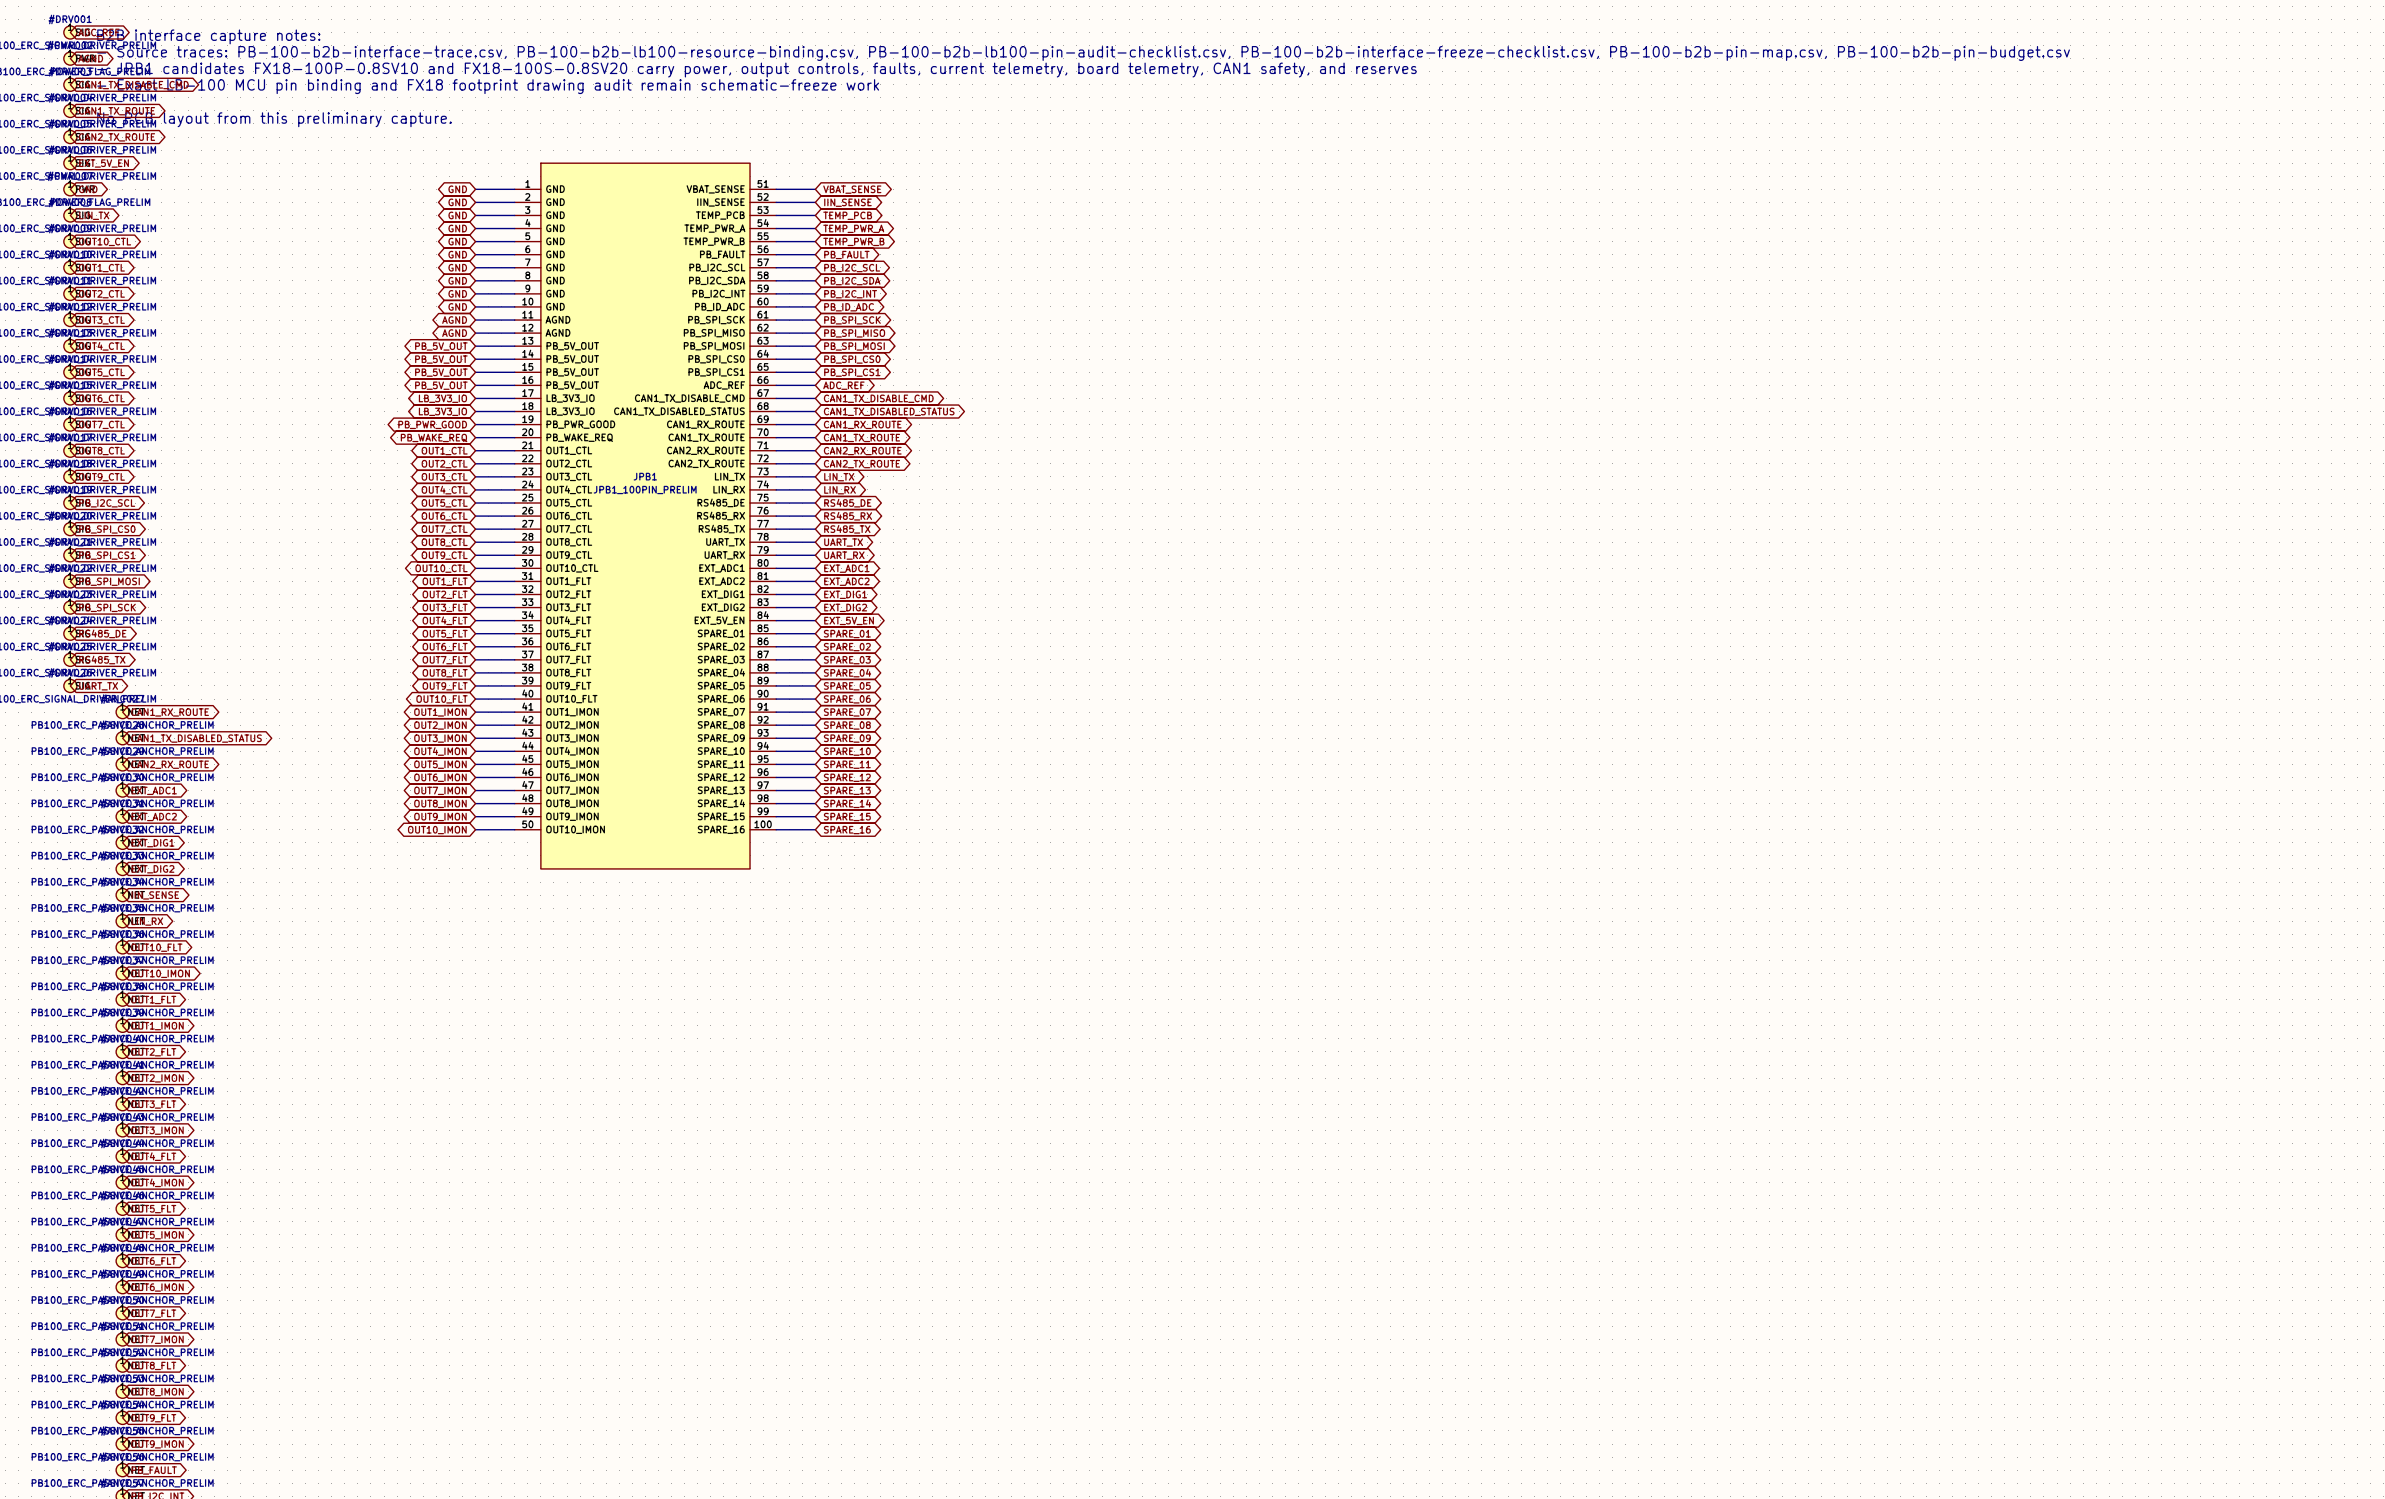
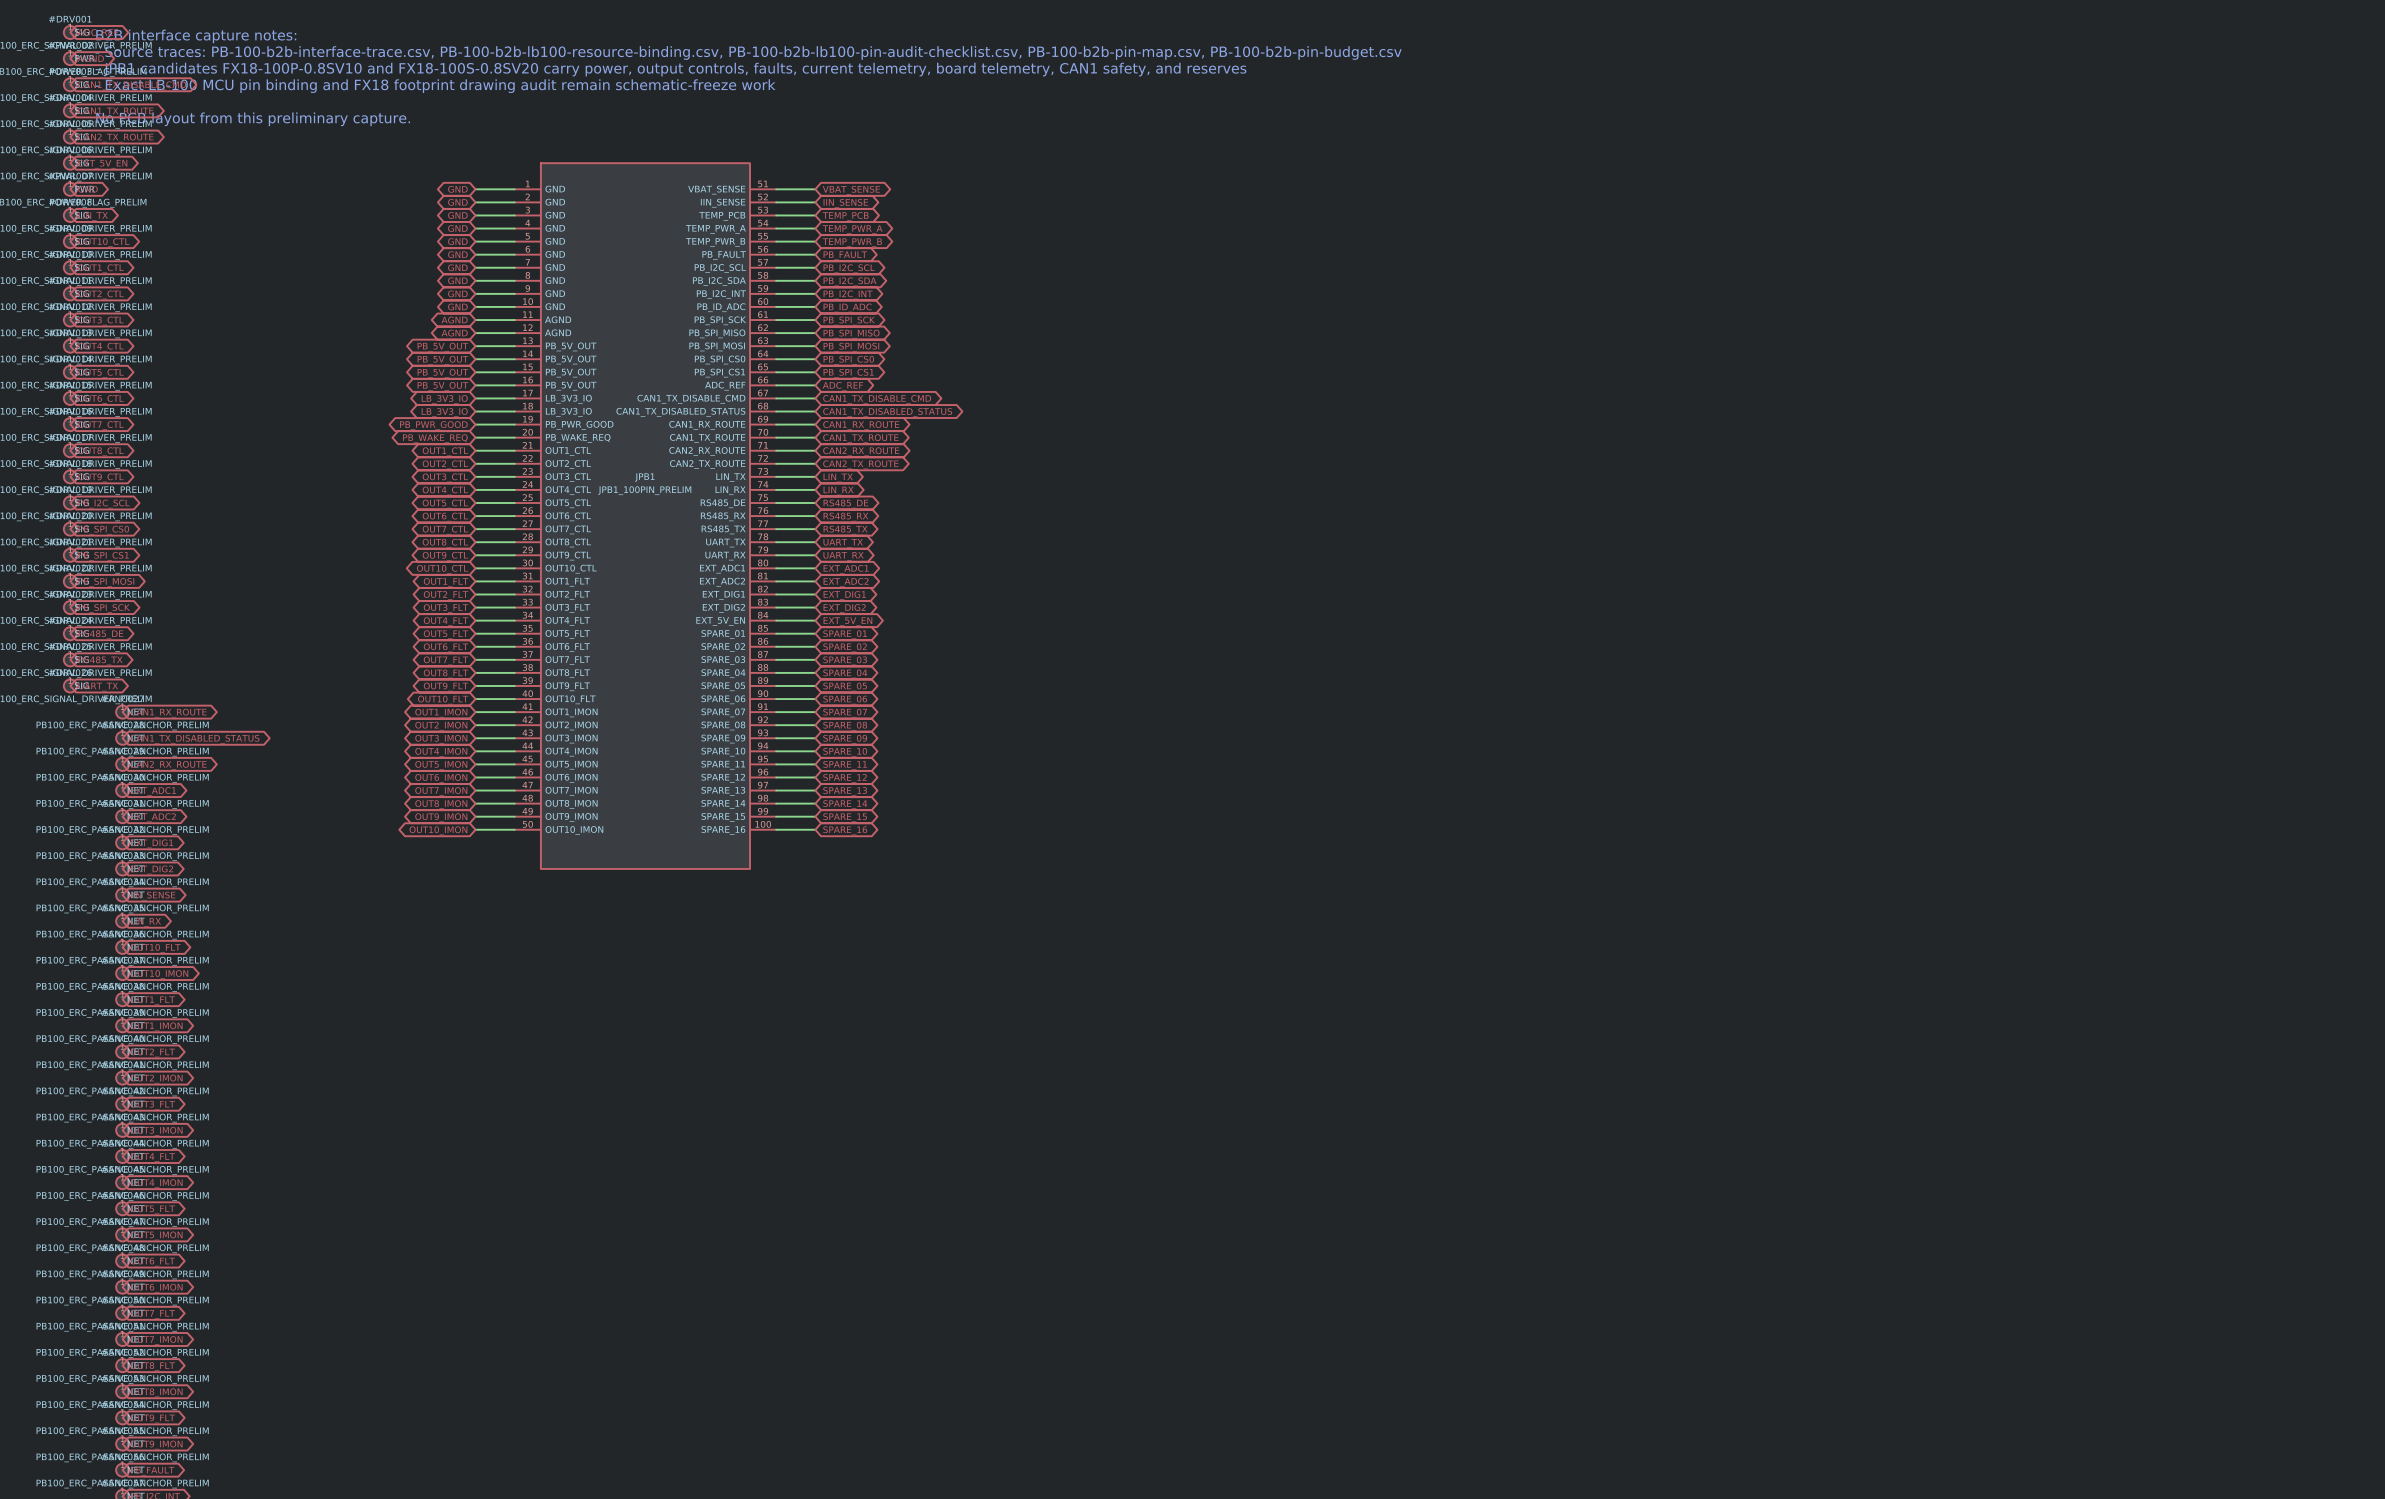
text: - Source traces: PB-100-b2b-interface-trace.csv, PB-100-b2b-lb100-resource-binding.csv, PB-100-b2b-lb100-pin-audit-checklist.csv, PB-100-b2b-interface-freeze-checklist.csv, PB-100-b2b-pin-map.csv, PB-100-b2b-pin-budget.csv (1083, 53) -> - Source traces: PB-100-b2b-interface-trace.csv, PB-100-b2b-lb100-resource-binding.csv, PB-100-b2b-lb100-pin-audit-checklist.csv, PB-100-b2b-pin-map.csv, PB-100-b2b-pin-budget.csv (748, 53)

